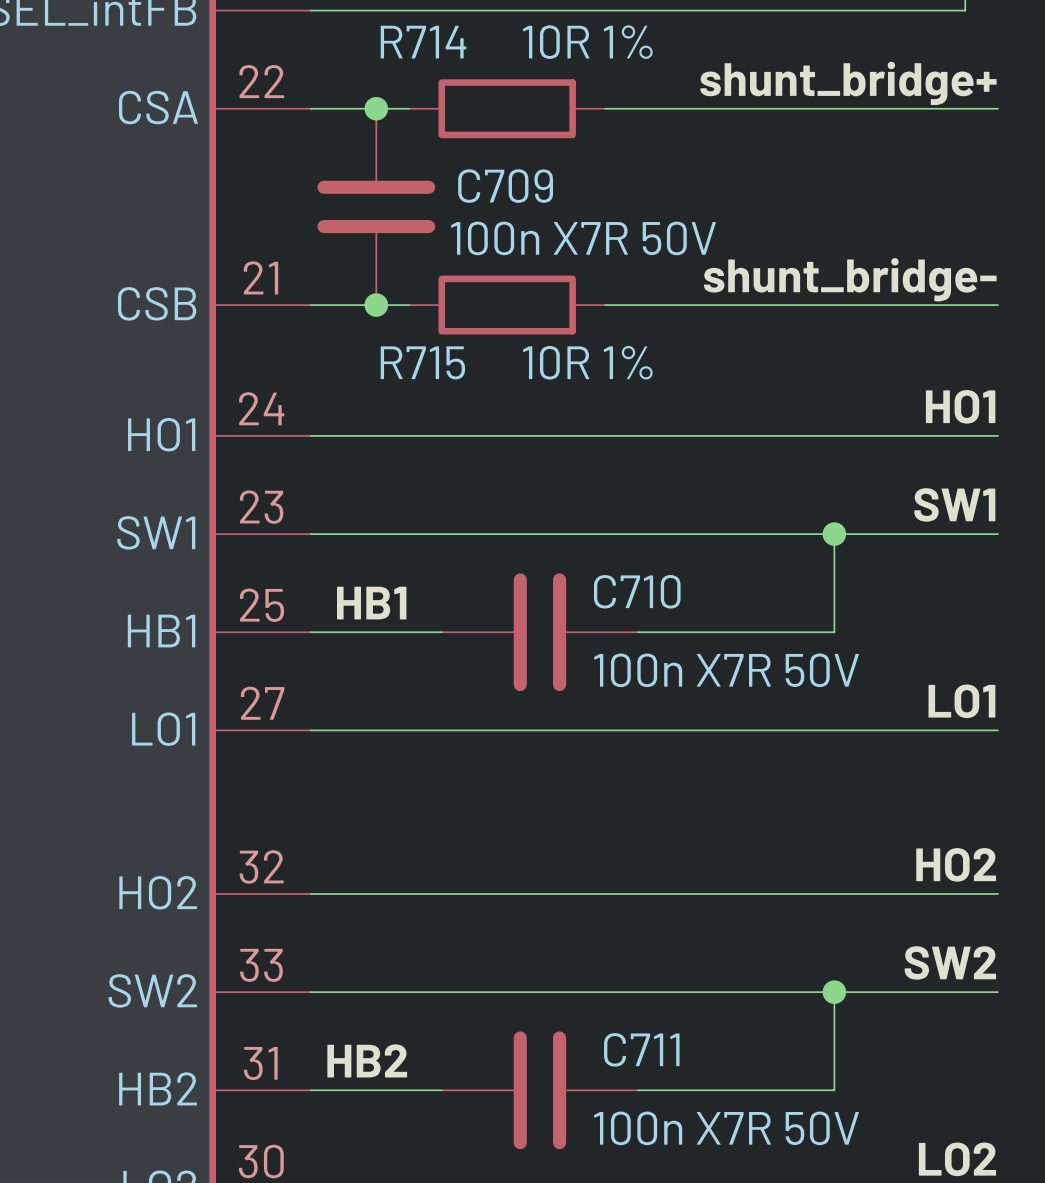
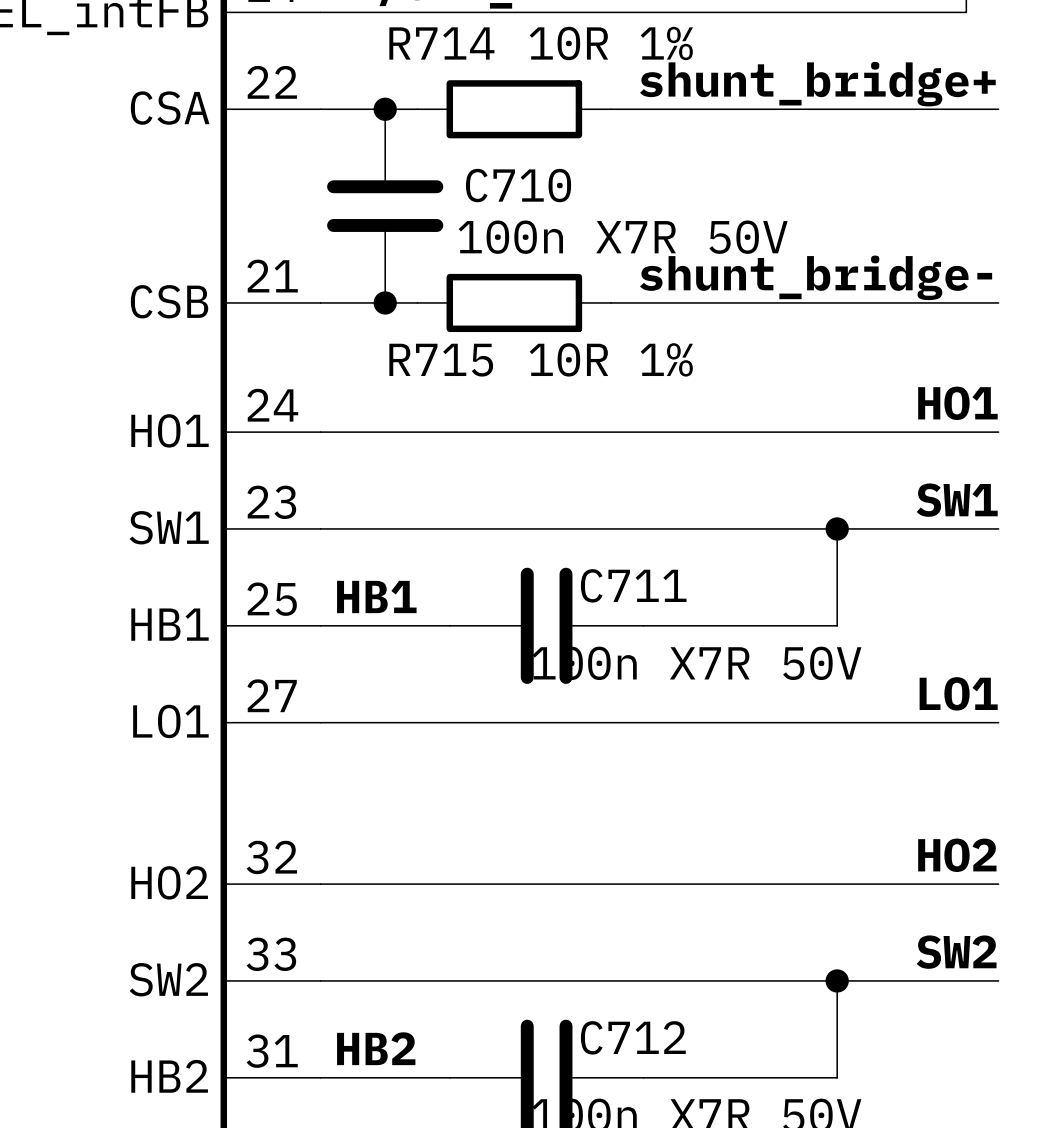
C709 name: C709 (505, 186) -> C710 (518, 185)
C710 name: C710 (637, 591) -> C711 (633, 585)
C711 name: C711 (641, 1049) -> C712 (633, 1037)

